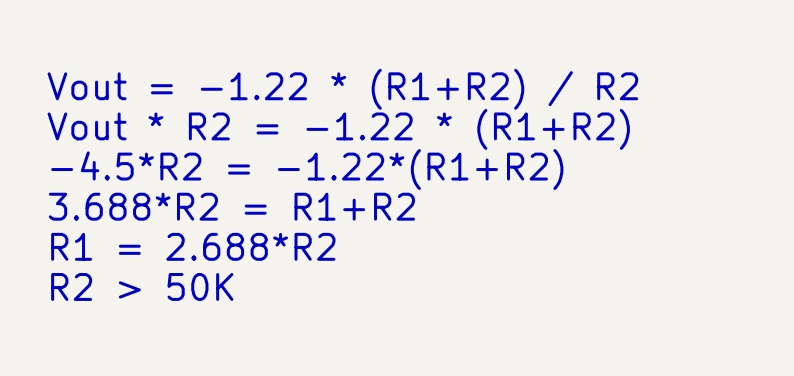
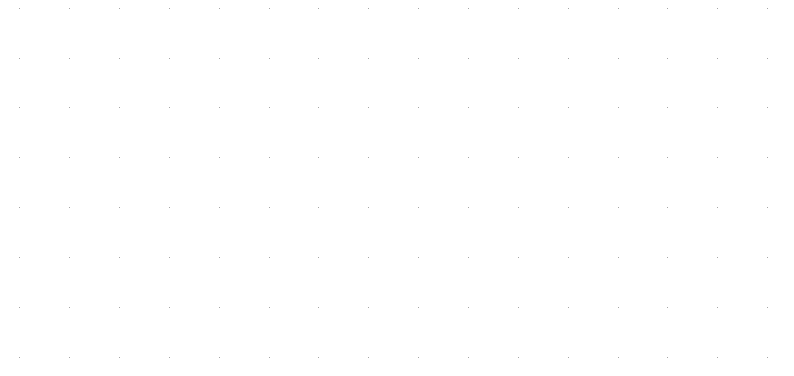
text: Vout = -1.22 * (R1+R2) / R2 (342, 89) -> none
text: Vout * R2 = -1.22 * (R1+R2) (338, 129) -> none
text: -4.5*R2 = -1.22*(R1+R2) (307, 169) -> none
text: 3.688*R2 = R1+R2 (231, 206) -> none
text: R1 = 2.688*R2 (193, 246) -> none
text: R2 > 50K (142, 286) -> none

